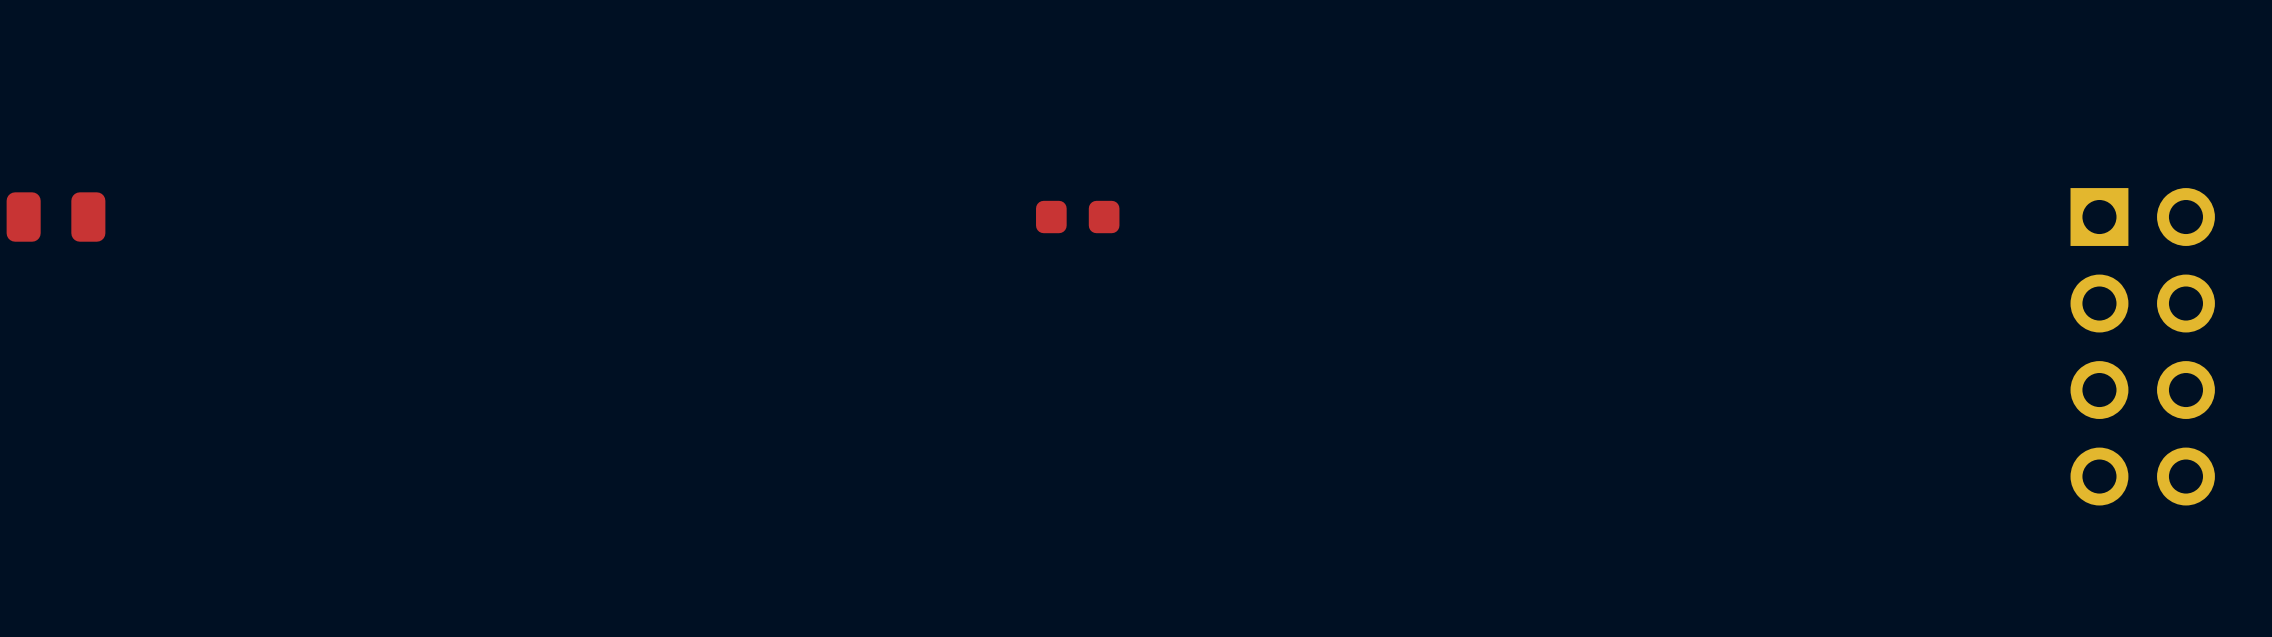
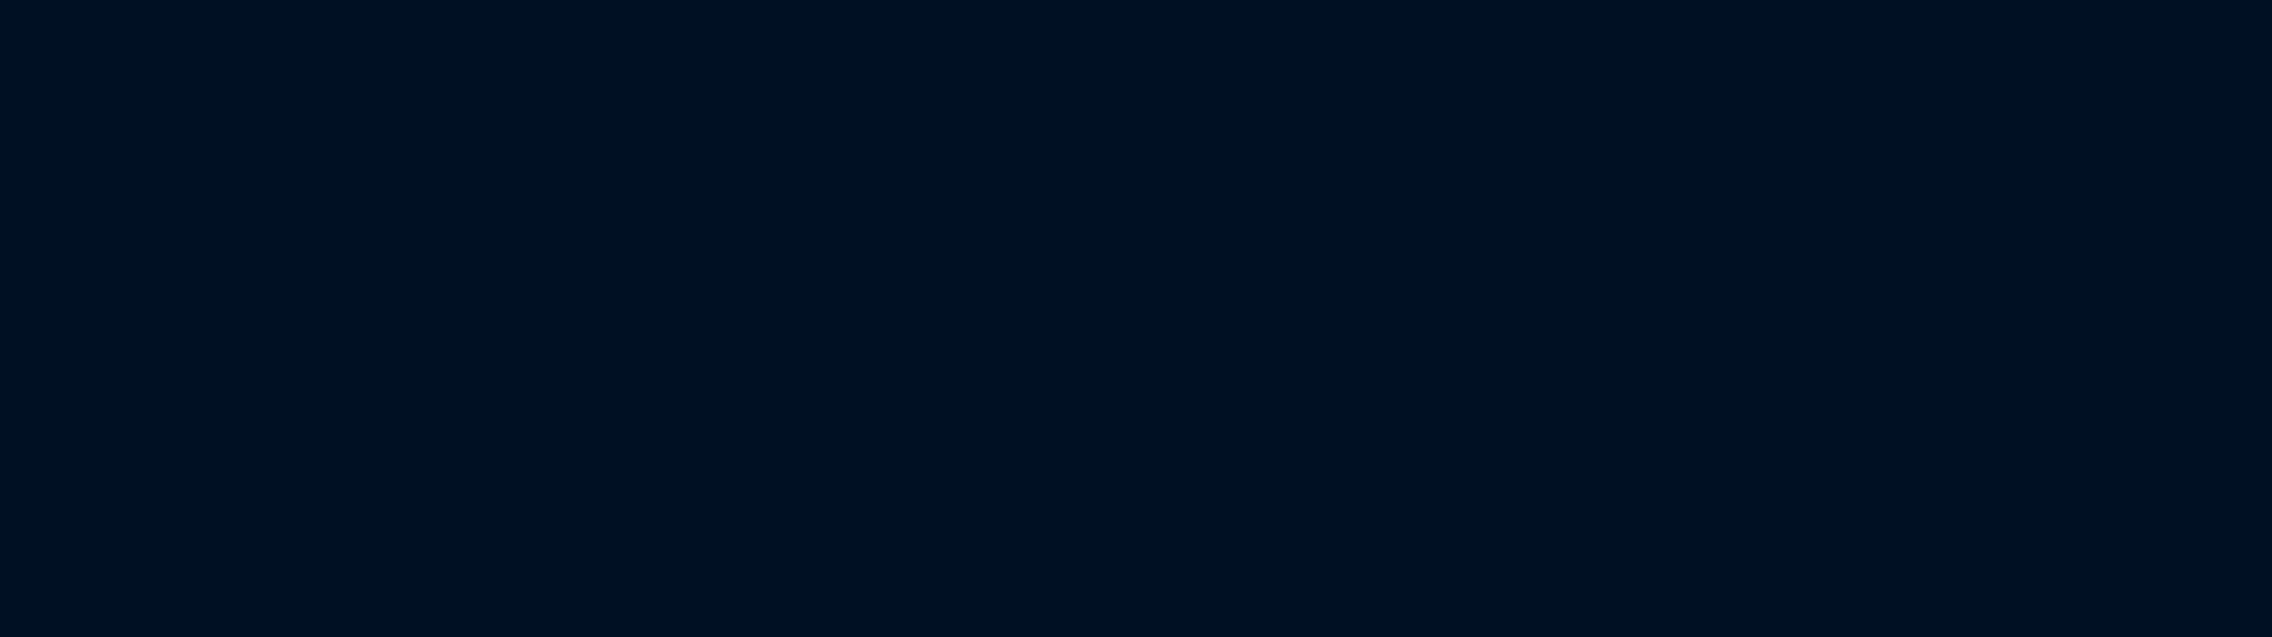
part: (56, 217) -> none
part: (1077, 217) -> none
part: (2142, 346) -> none

